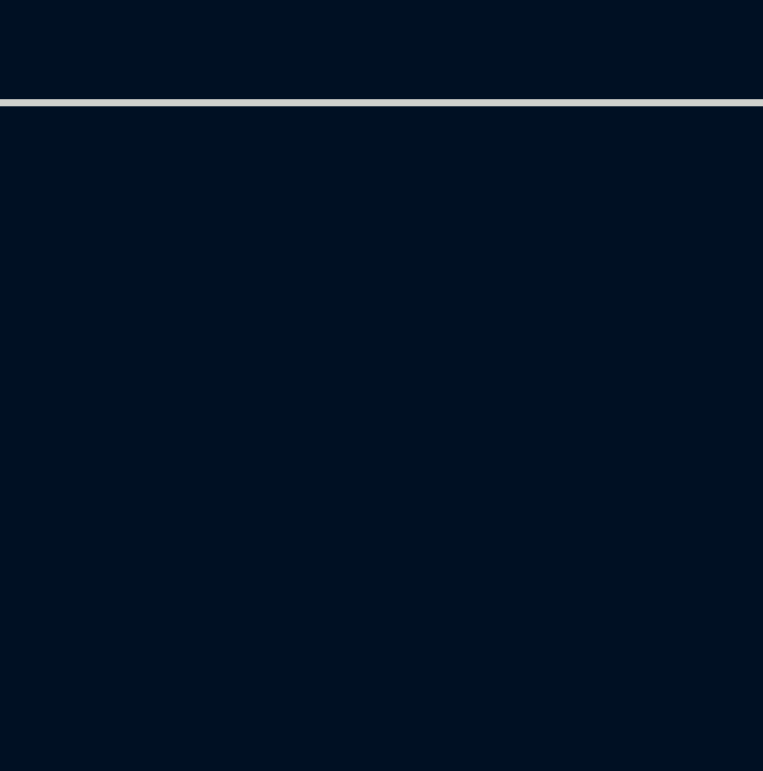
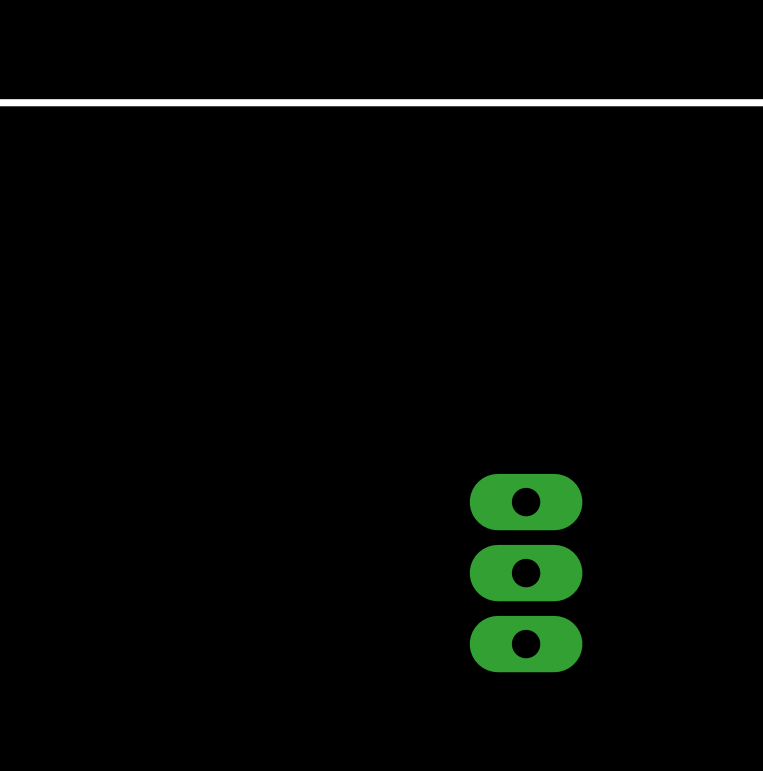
part: none -> (526, 573)

